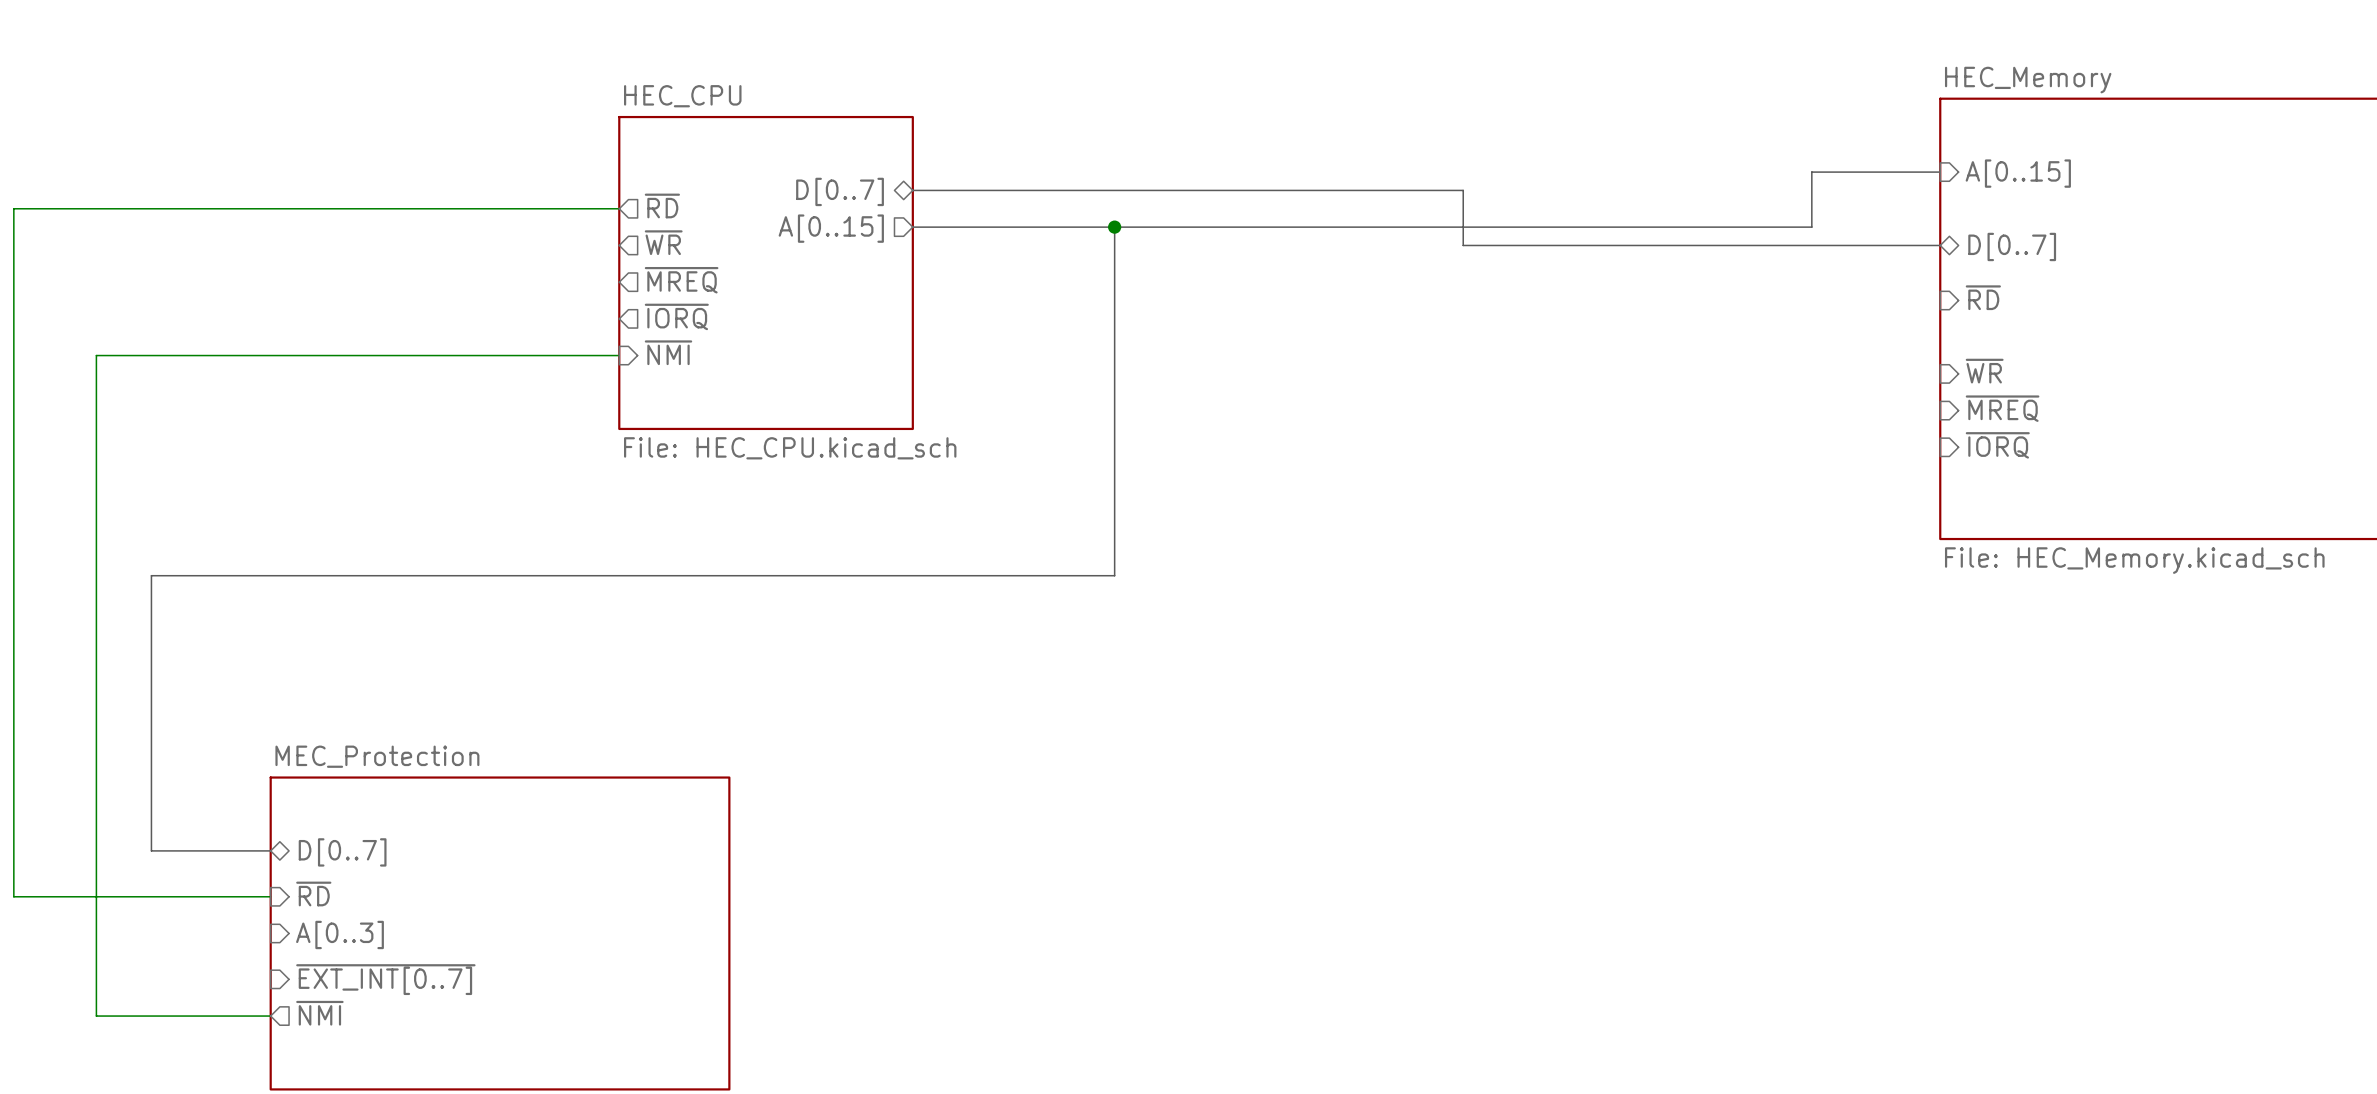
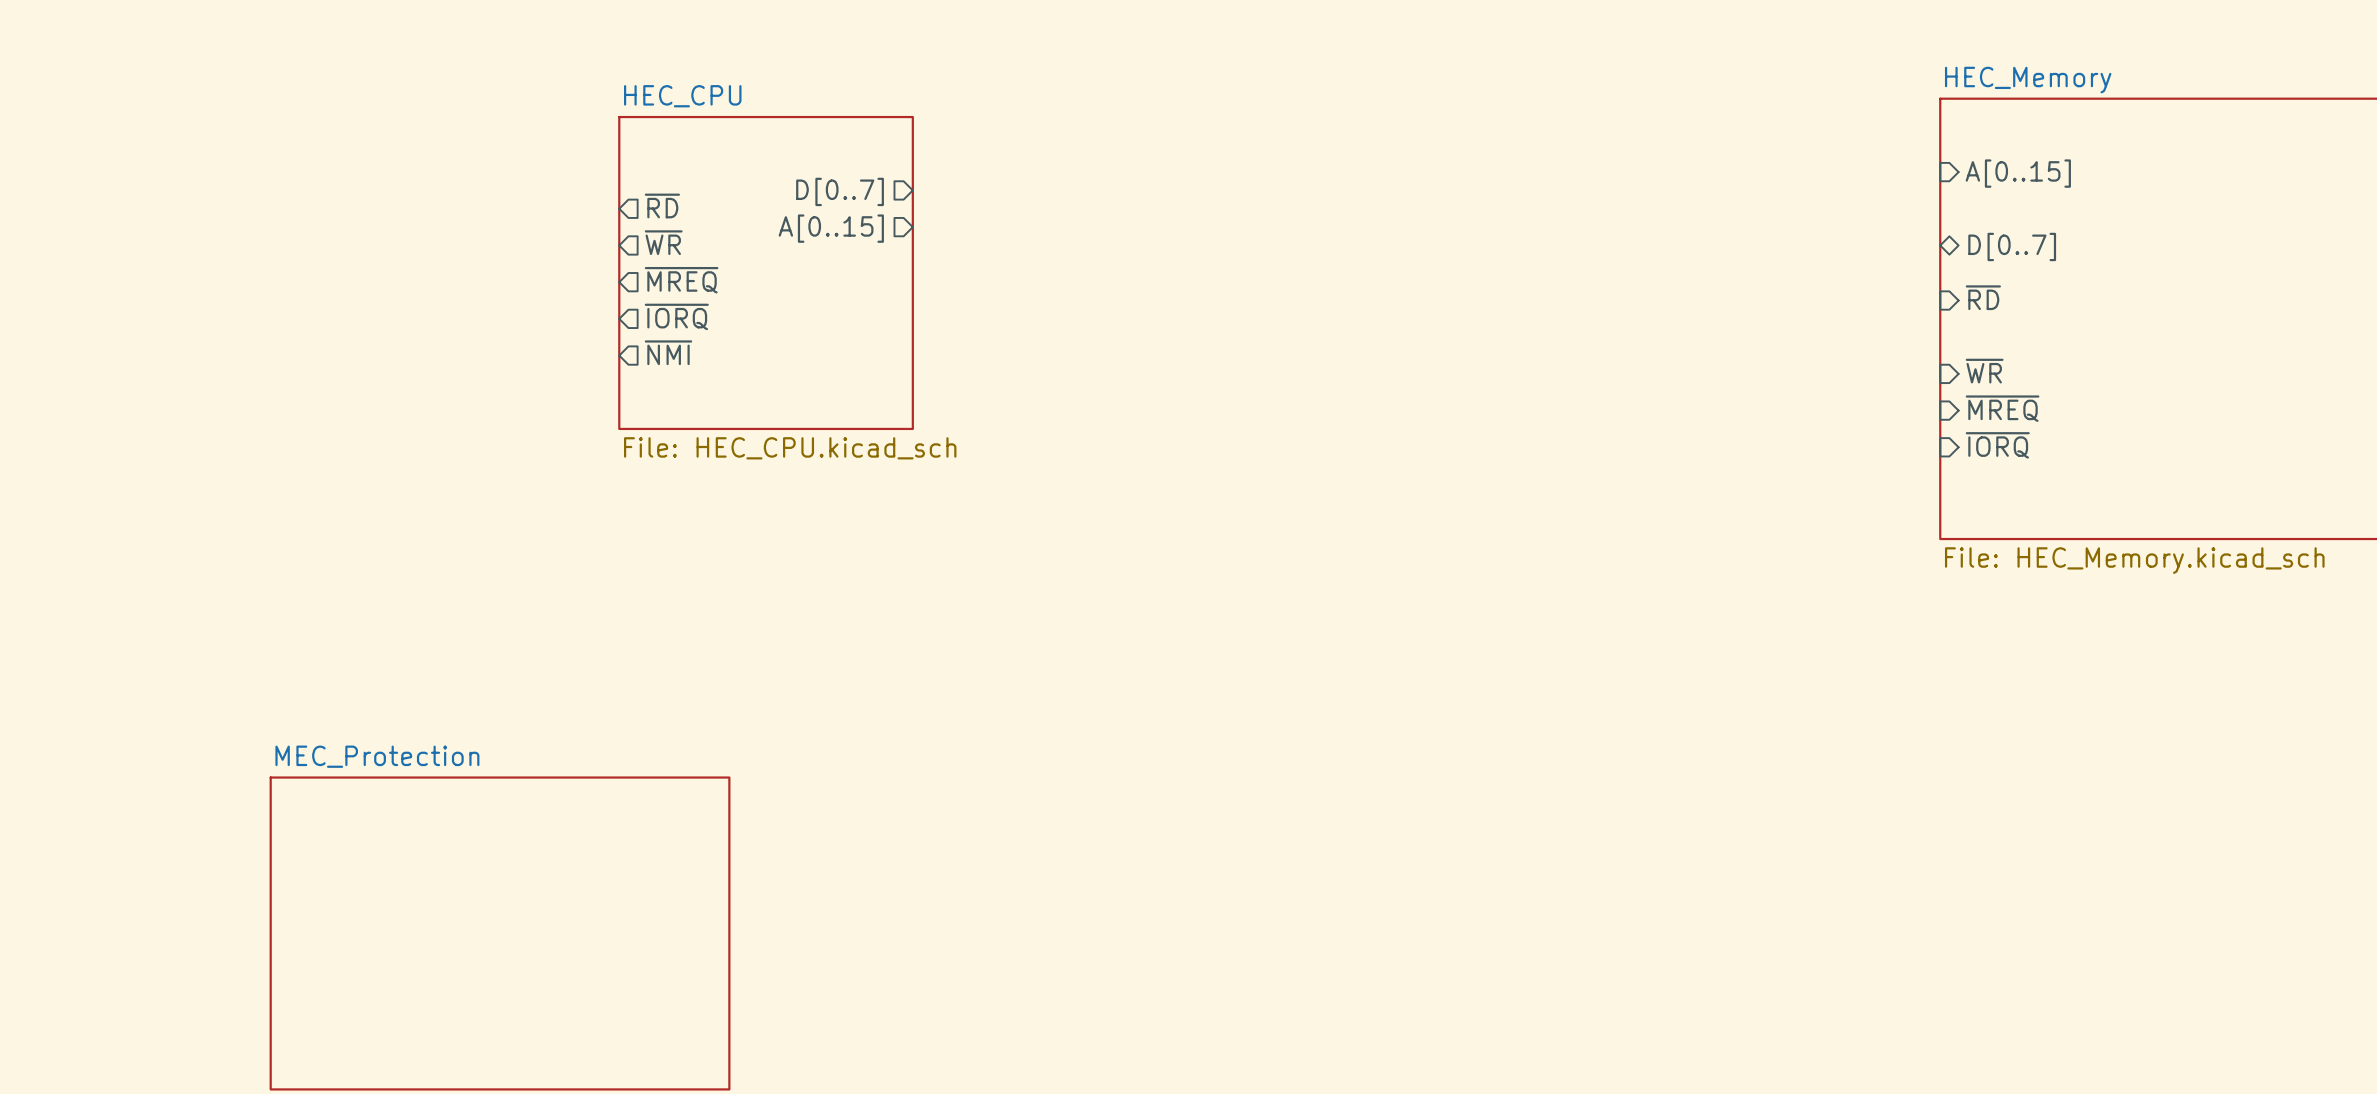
bus: (1940, 172) (1811, 172) (1811, 227) (912, 227) -> none
bus: (912, 190) (1463, 190) (1463, 245) (1940, 245) -> none
sheet pin shape: bidirectional (840, 191) -> output (840, 191)
wire: (619, 208) (13, 208) (13, 896) (270, 896) -> none
bus: (1114, 227) (1114, 575) (151, 575) (151, 850) (270, 850) -> none
junction: (1114, 227) -> none
sheet pin shape: input (668, 352) -> output (668, 352)
wire: (619, 355) (96, 355) (96, 1016) (270, 1016) -> none
sheet pin: D[0..7] (342, 852) -> none
sheet pin: ~{RD} (313, 893) -> none
sheet pin: A[0..3] (340, 934) -> none
sheet pin: ~{EXT_INT[0..7]} (385, 979) -> none
sheet pin: ~{NMI} (319, 1013) -> none

